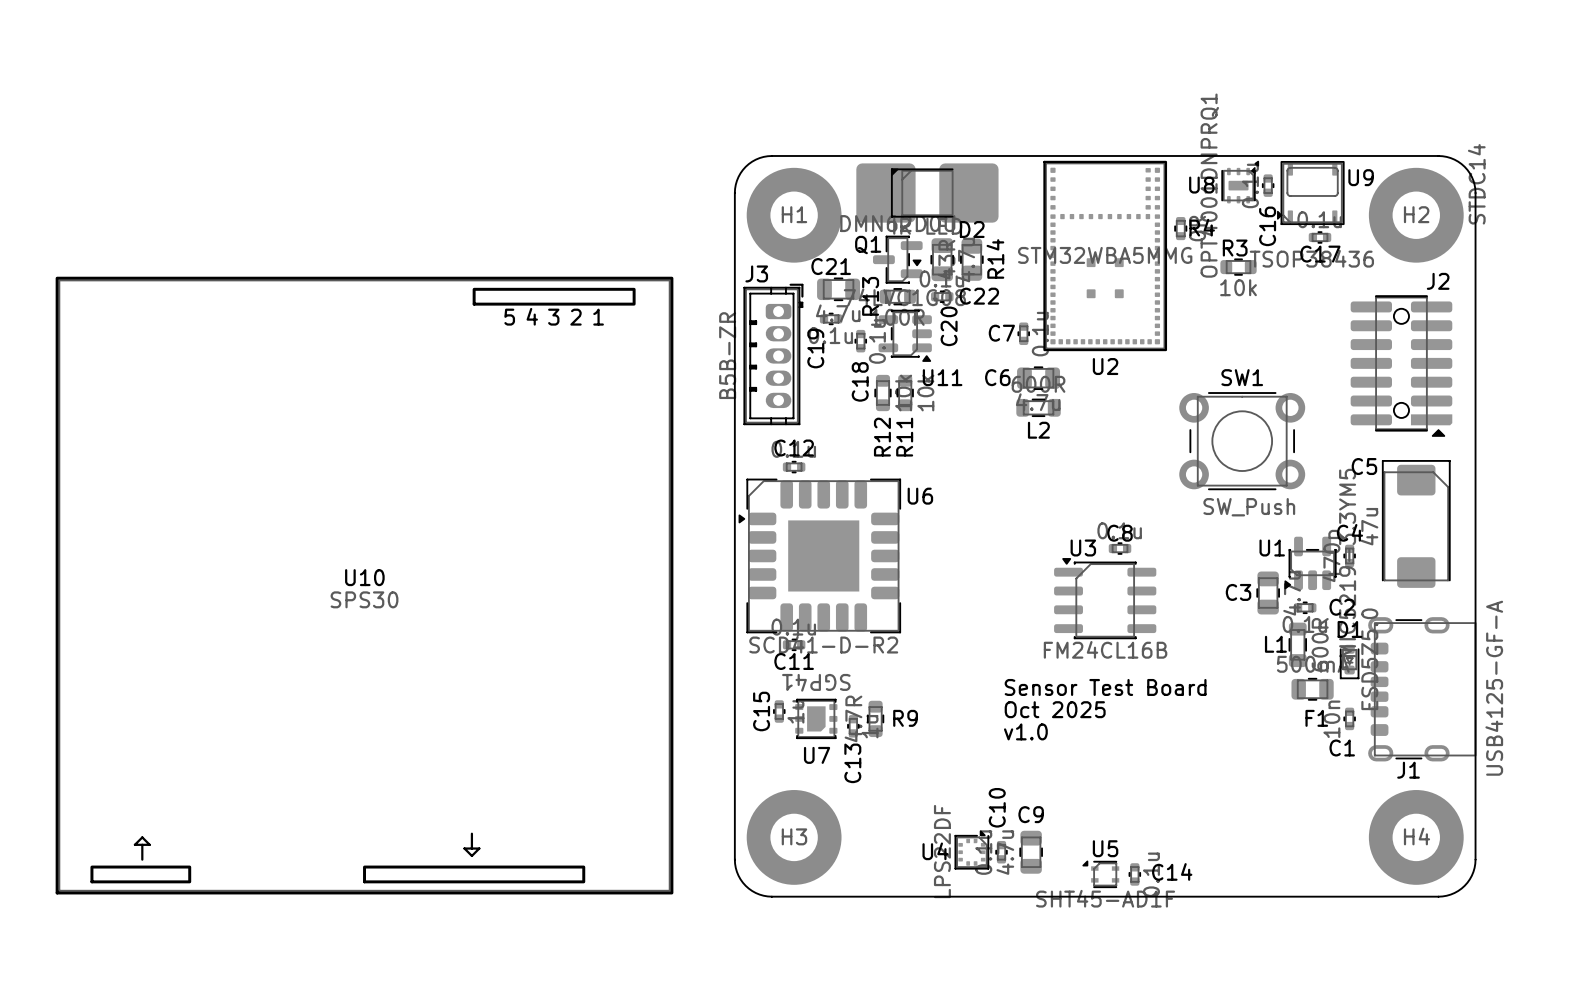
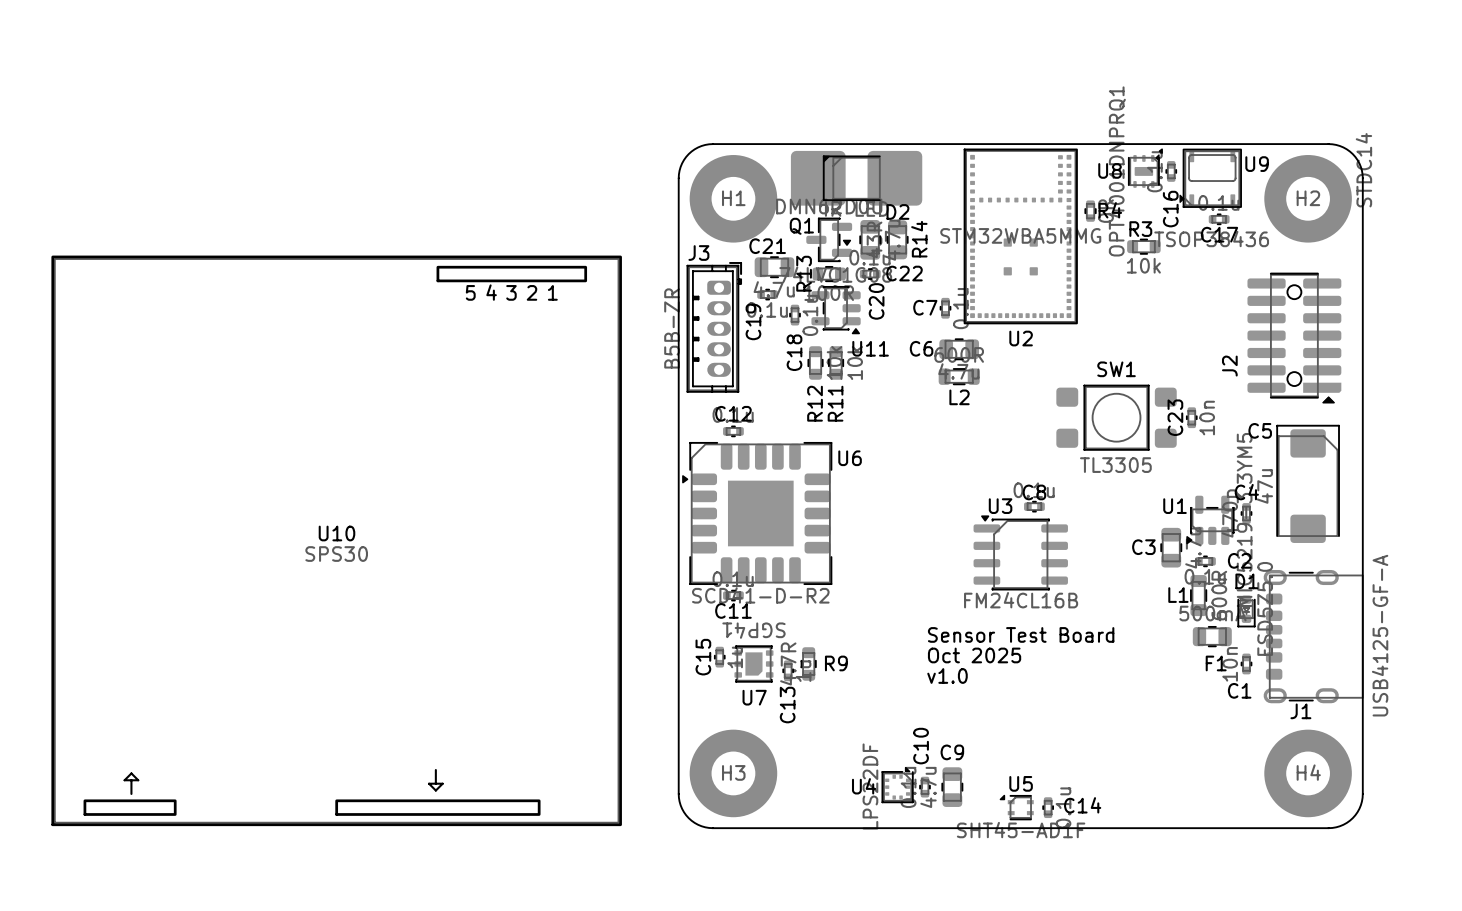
J2 name rotation: 0° (1438, 281) -> 90° counterclockwise (1229, 366)
J2 name position: J2 (1438, 281) -> J2 (1229, 366)
SW1 footprint: [1179, 392, 1306, 491] -> [1056, 384, 1177, 451]
C23: none -> 10n (1191, 417)
SW1 value: SW_Push (1249, 507) -> TL3305 (1115, 465)

